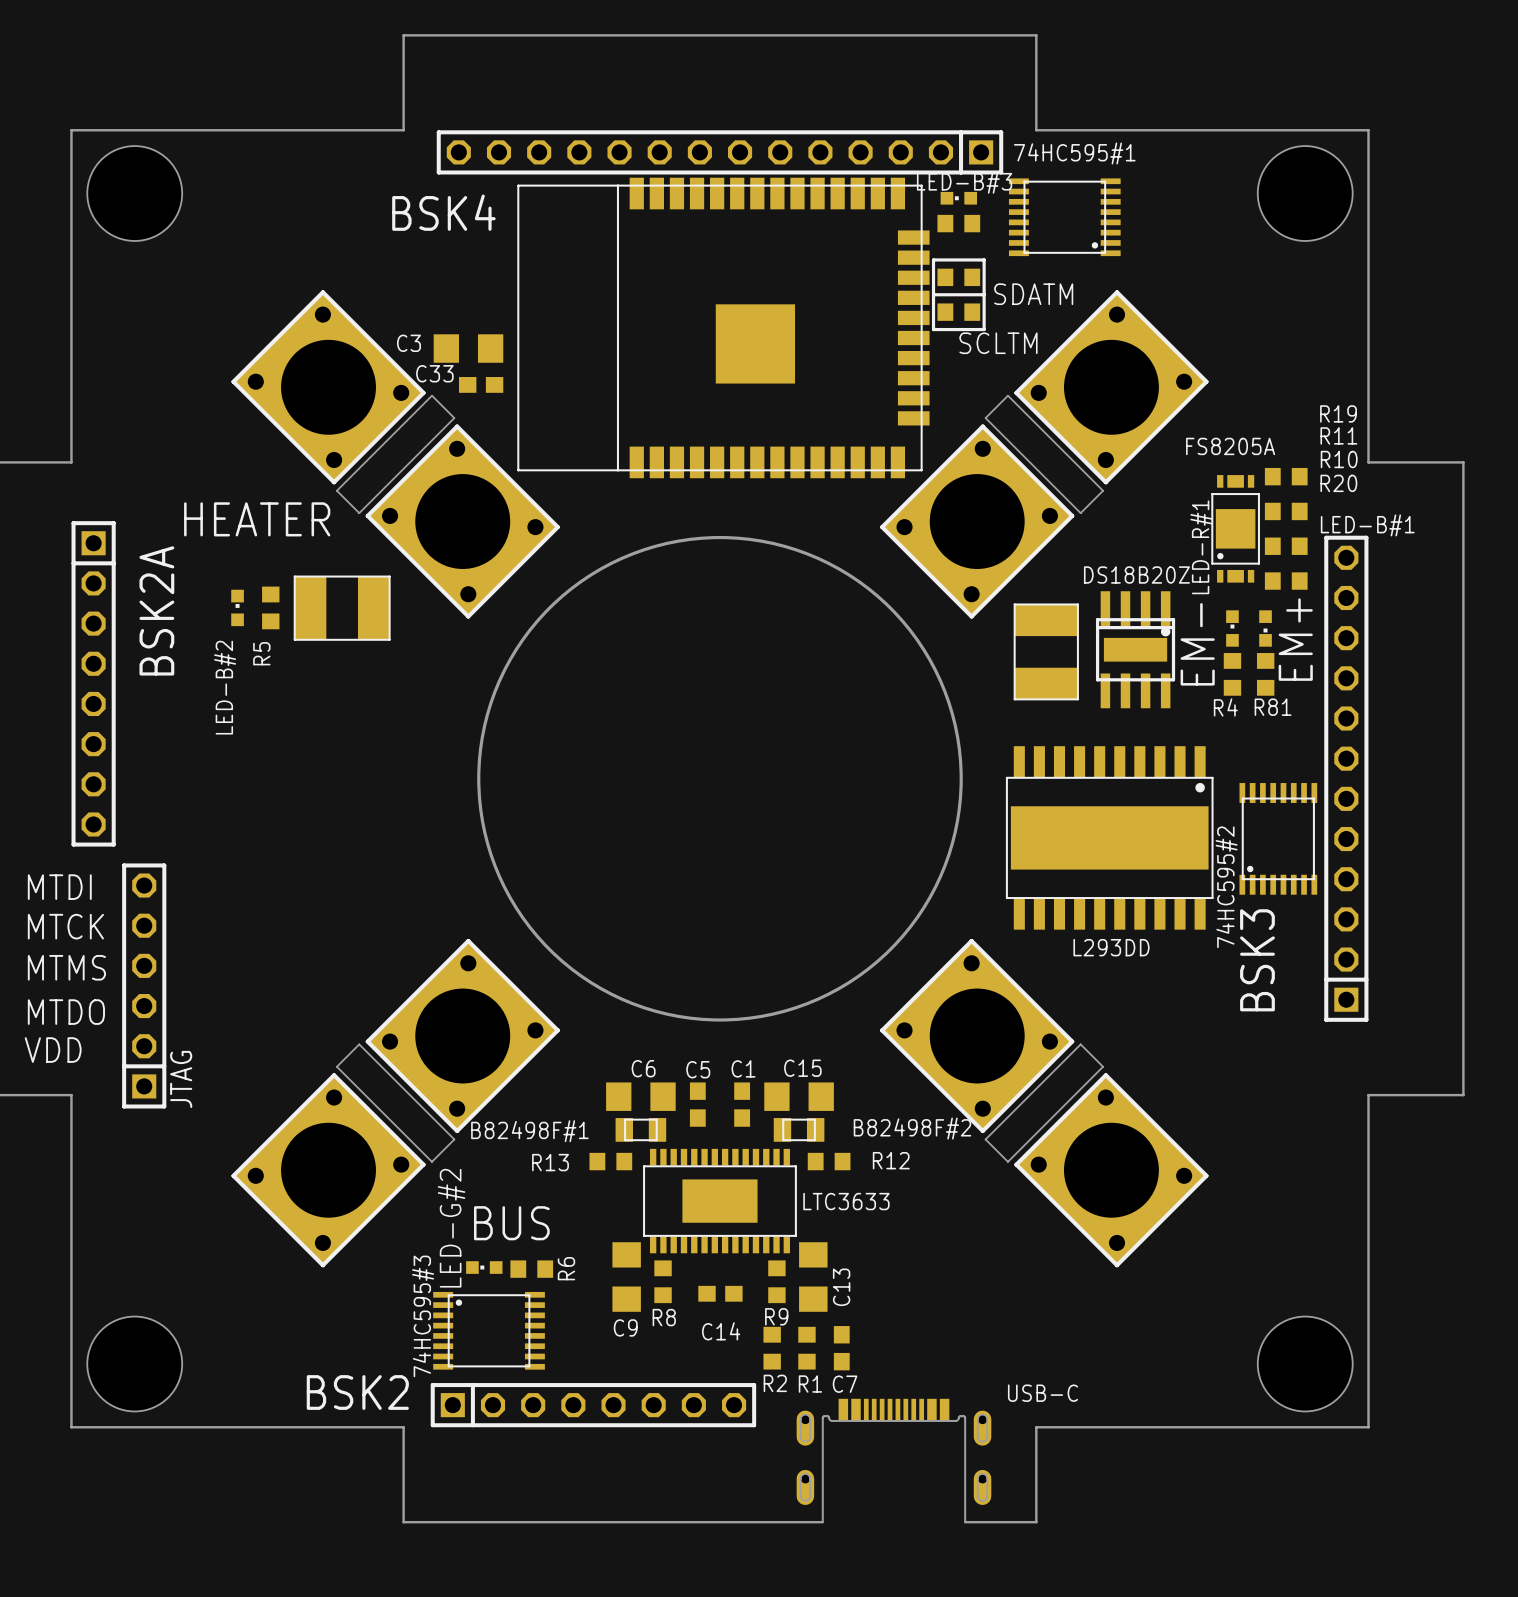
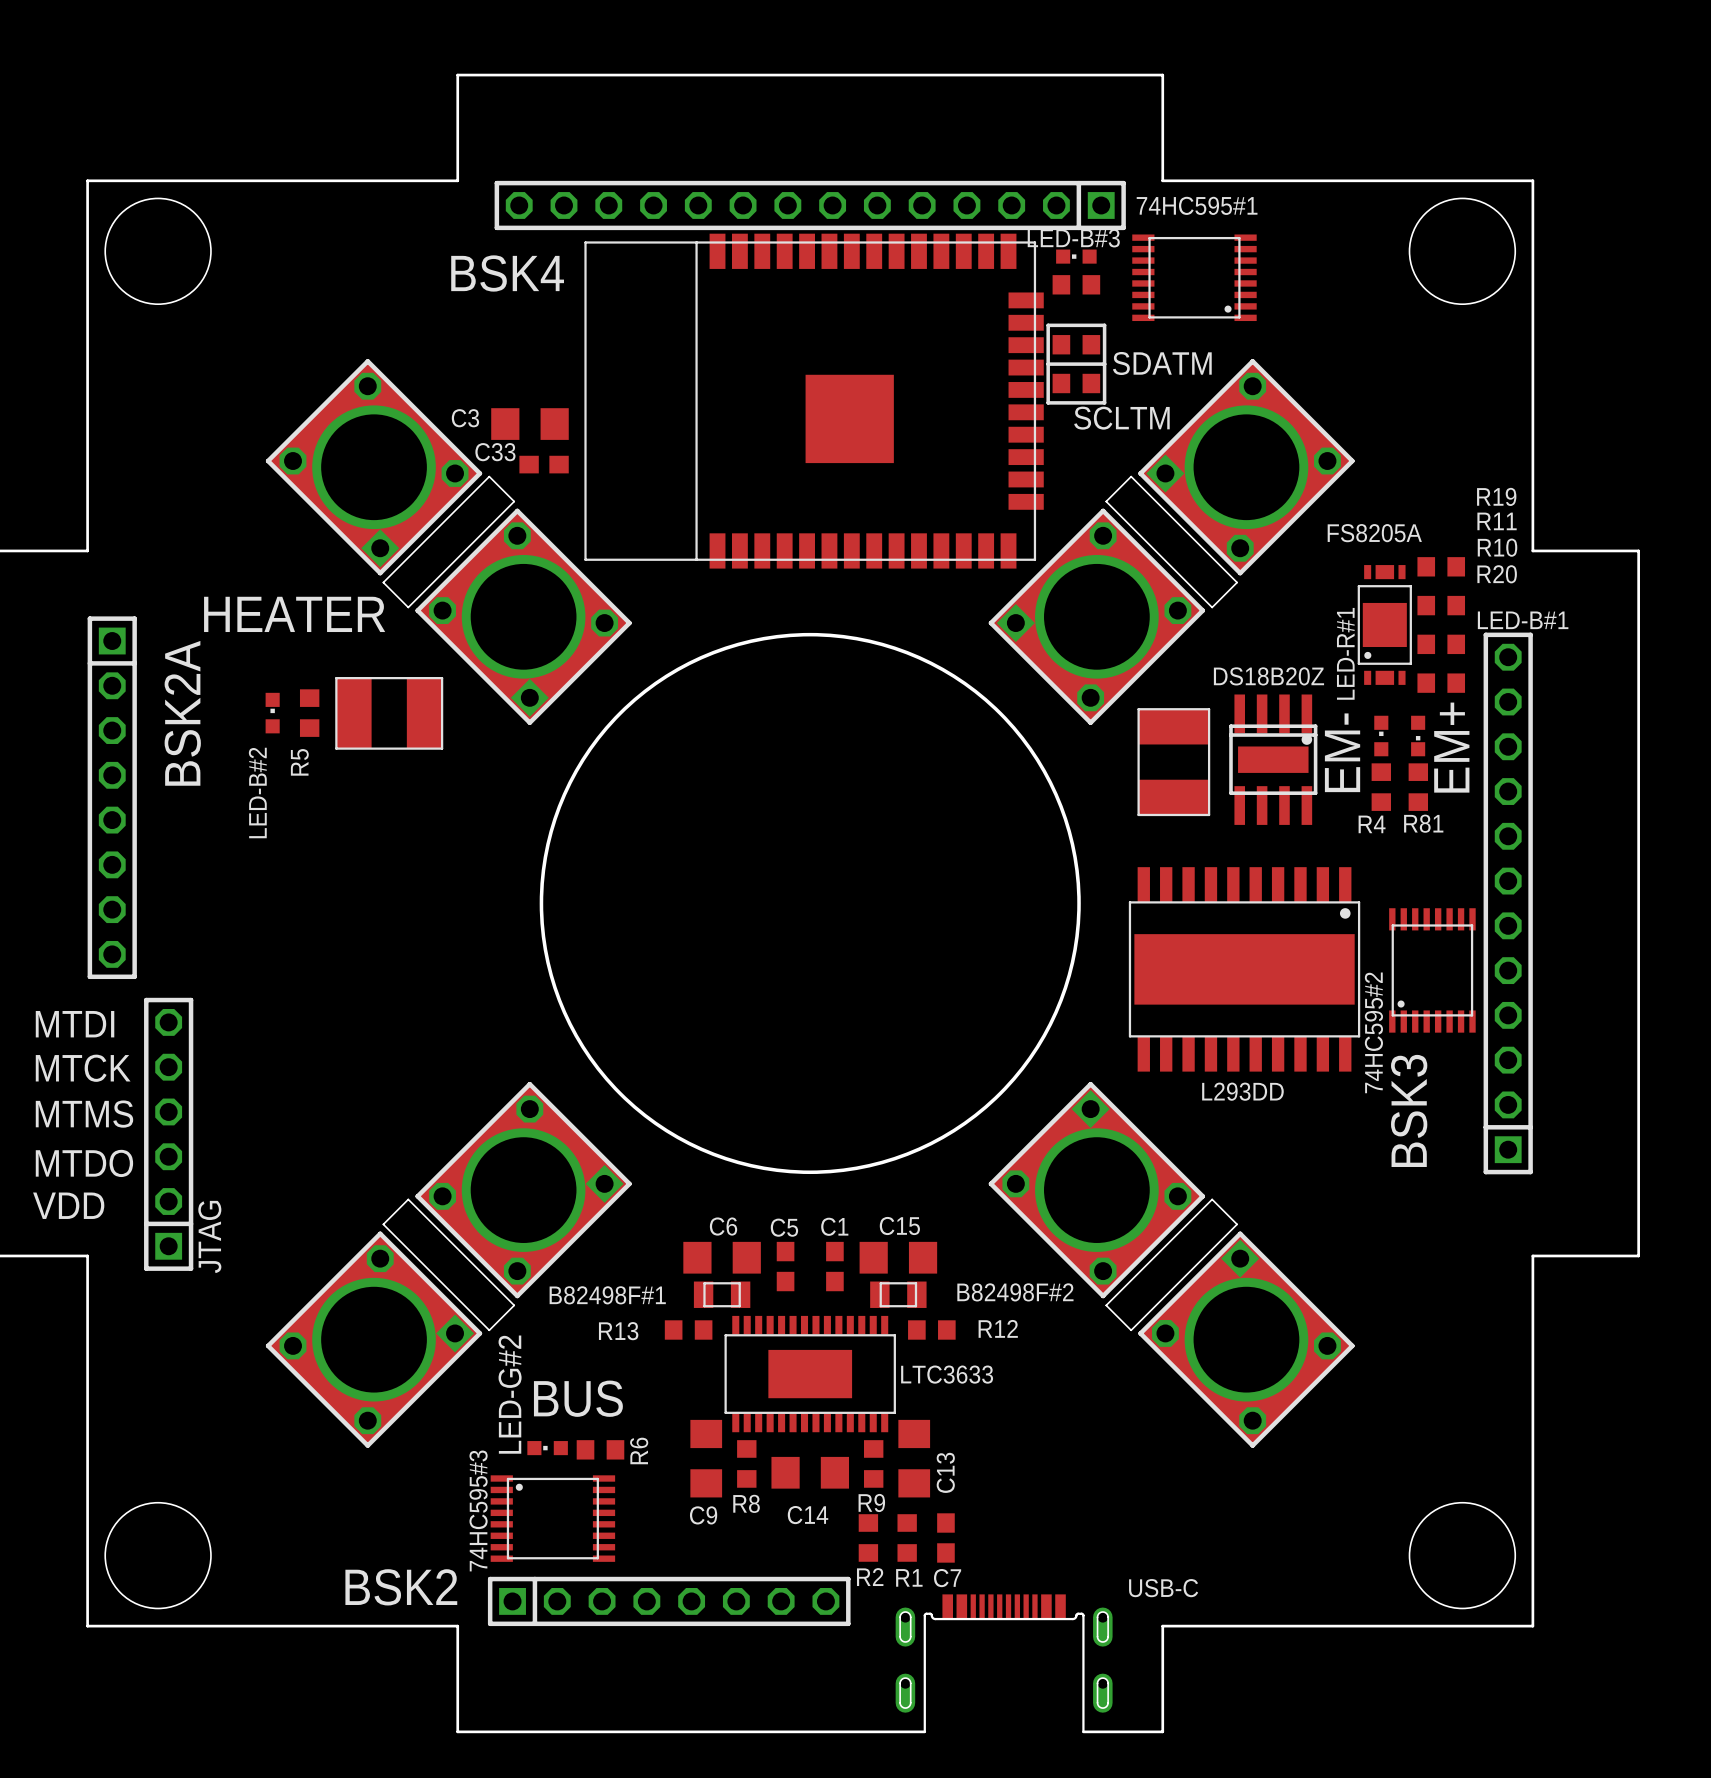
C14 footprint: [698, 1285, 743, 1302] -> [771, 1456, 850, 1489]

